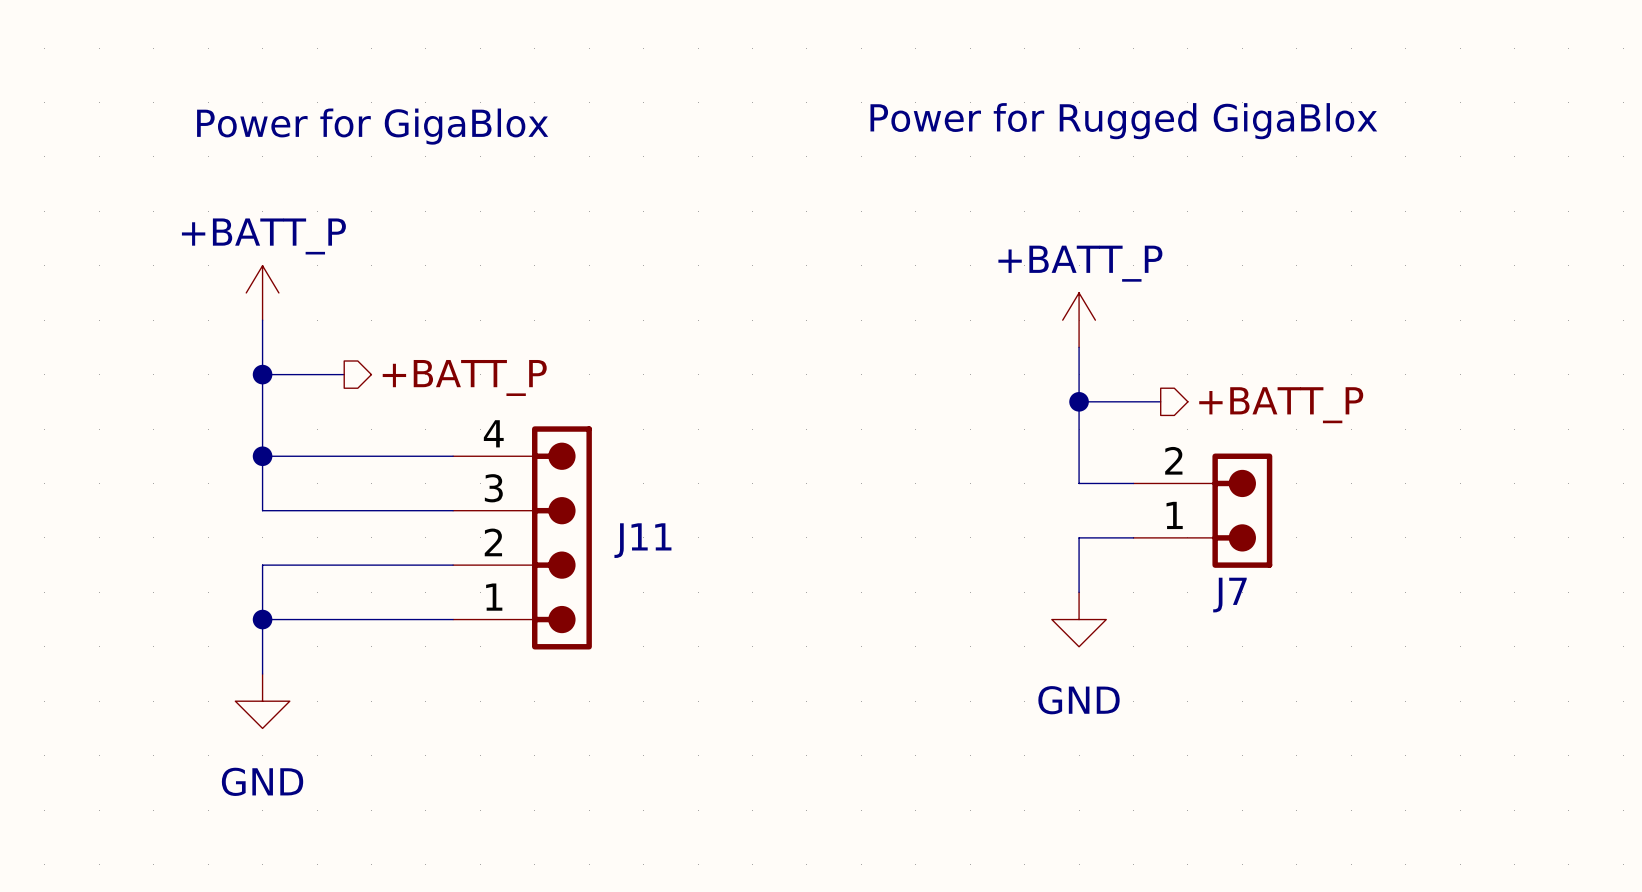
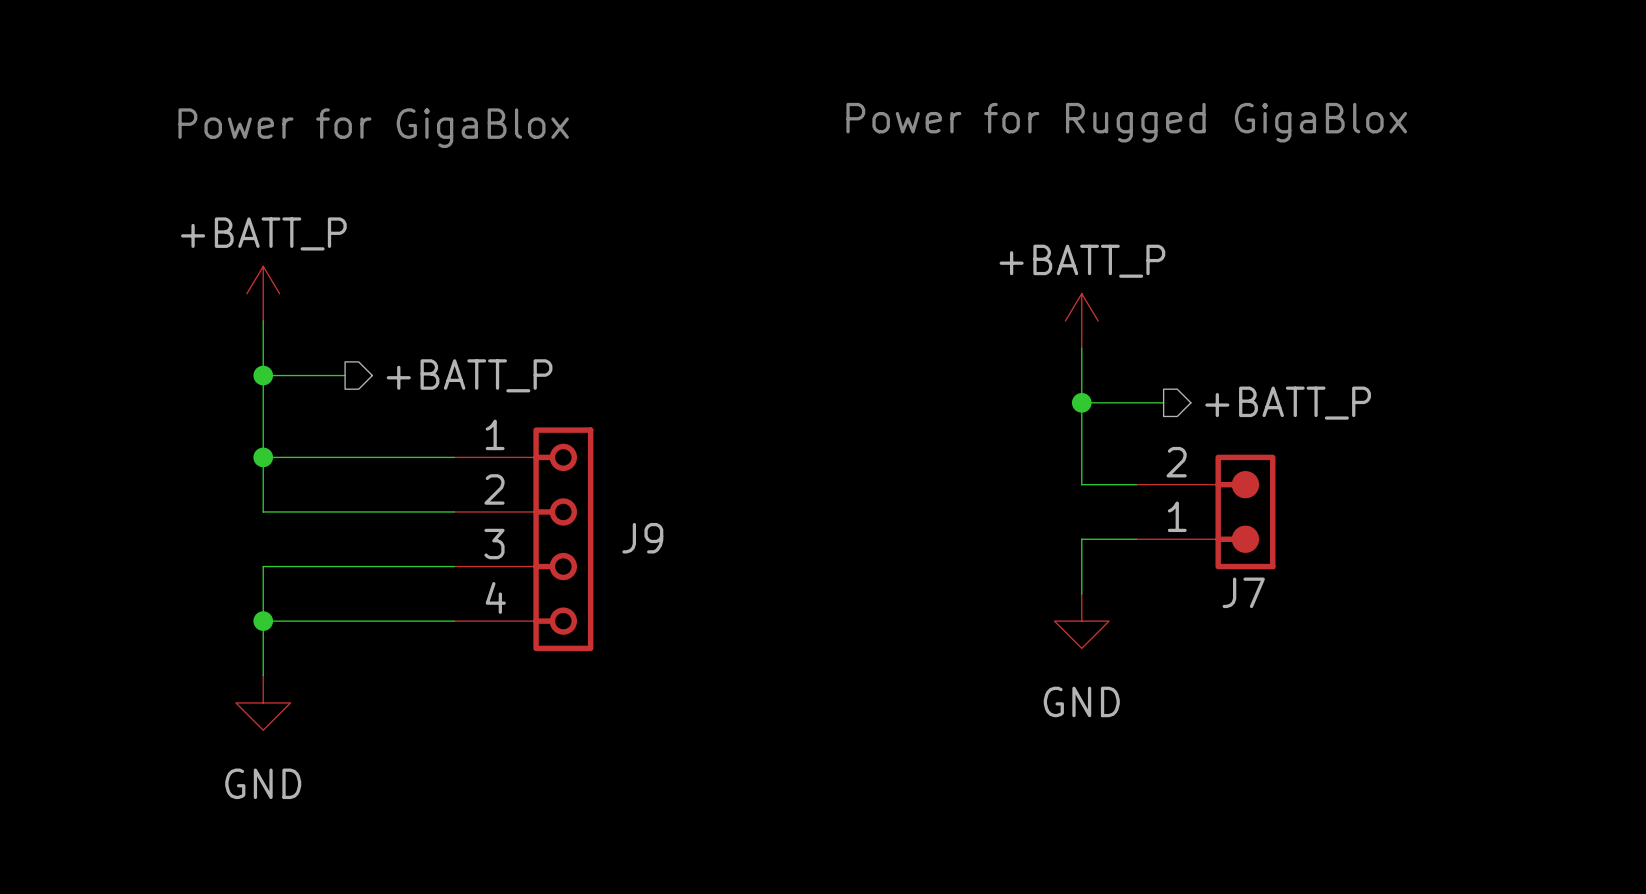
J11: (522, 537) -> none
J9: none -> (523, 539)

